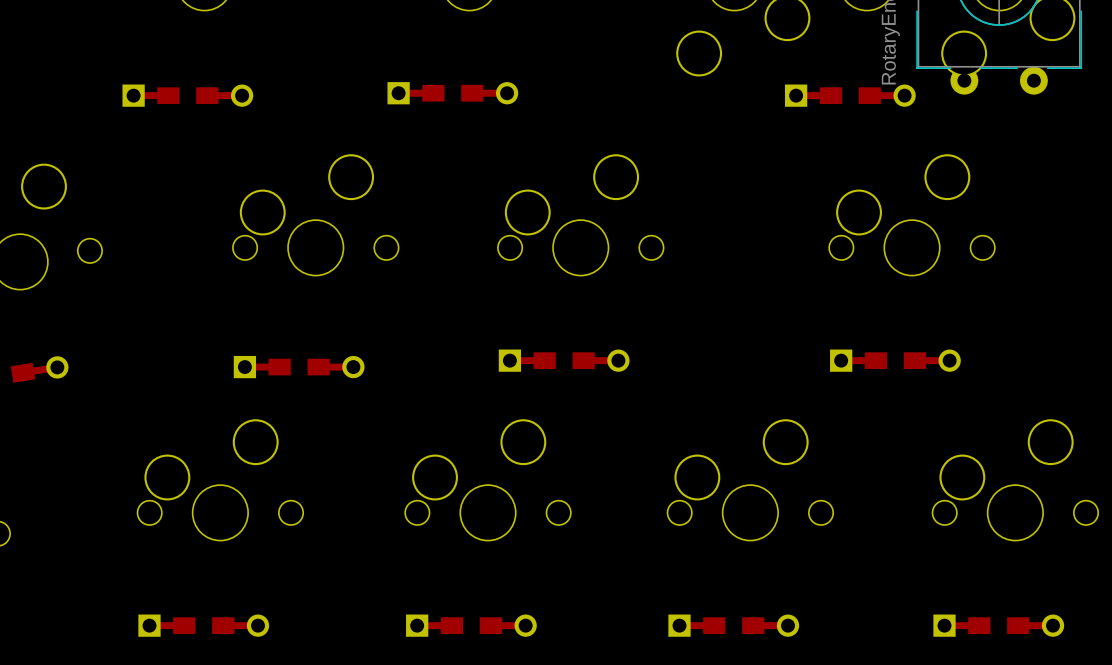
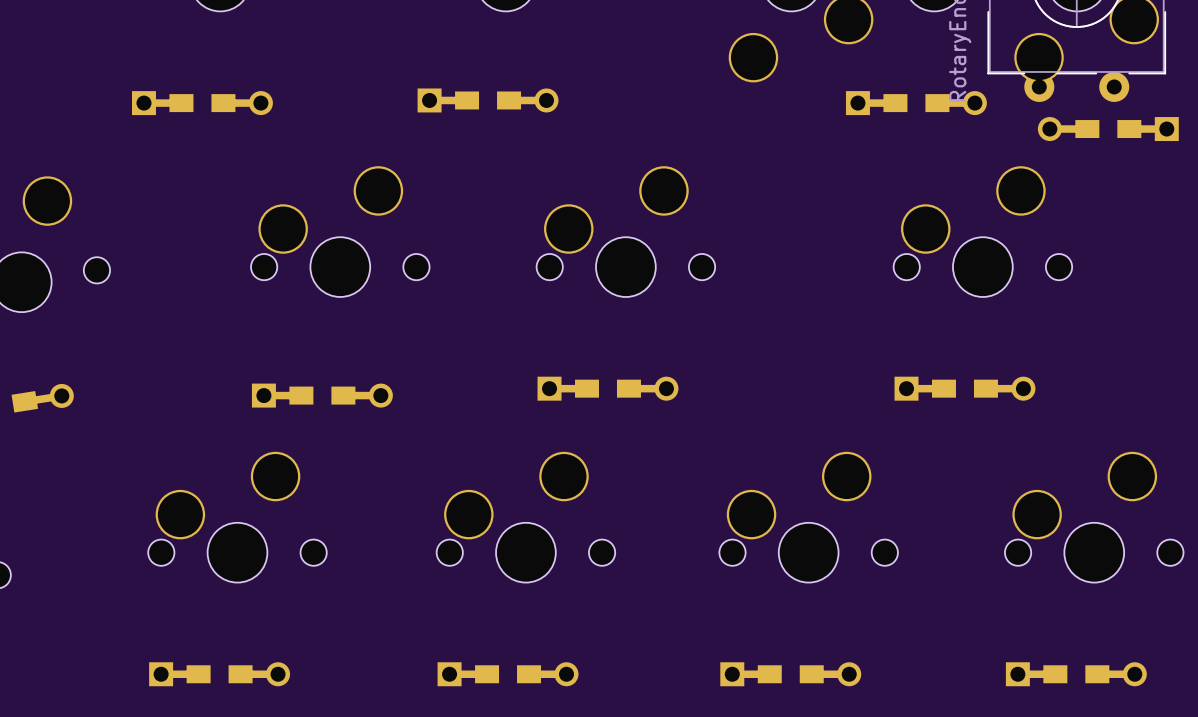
part: none -> (1108, 129)

